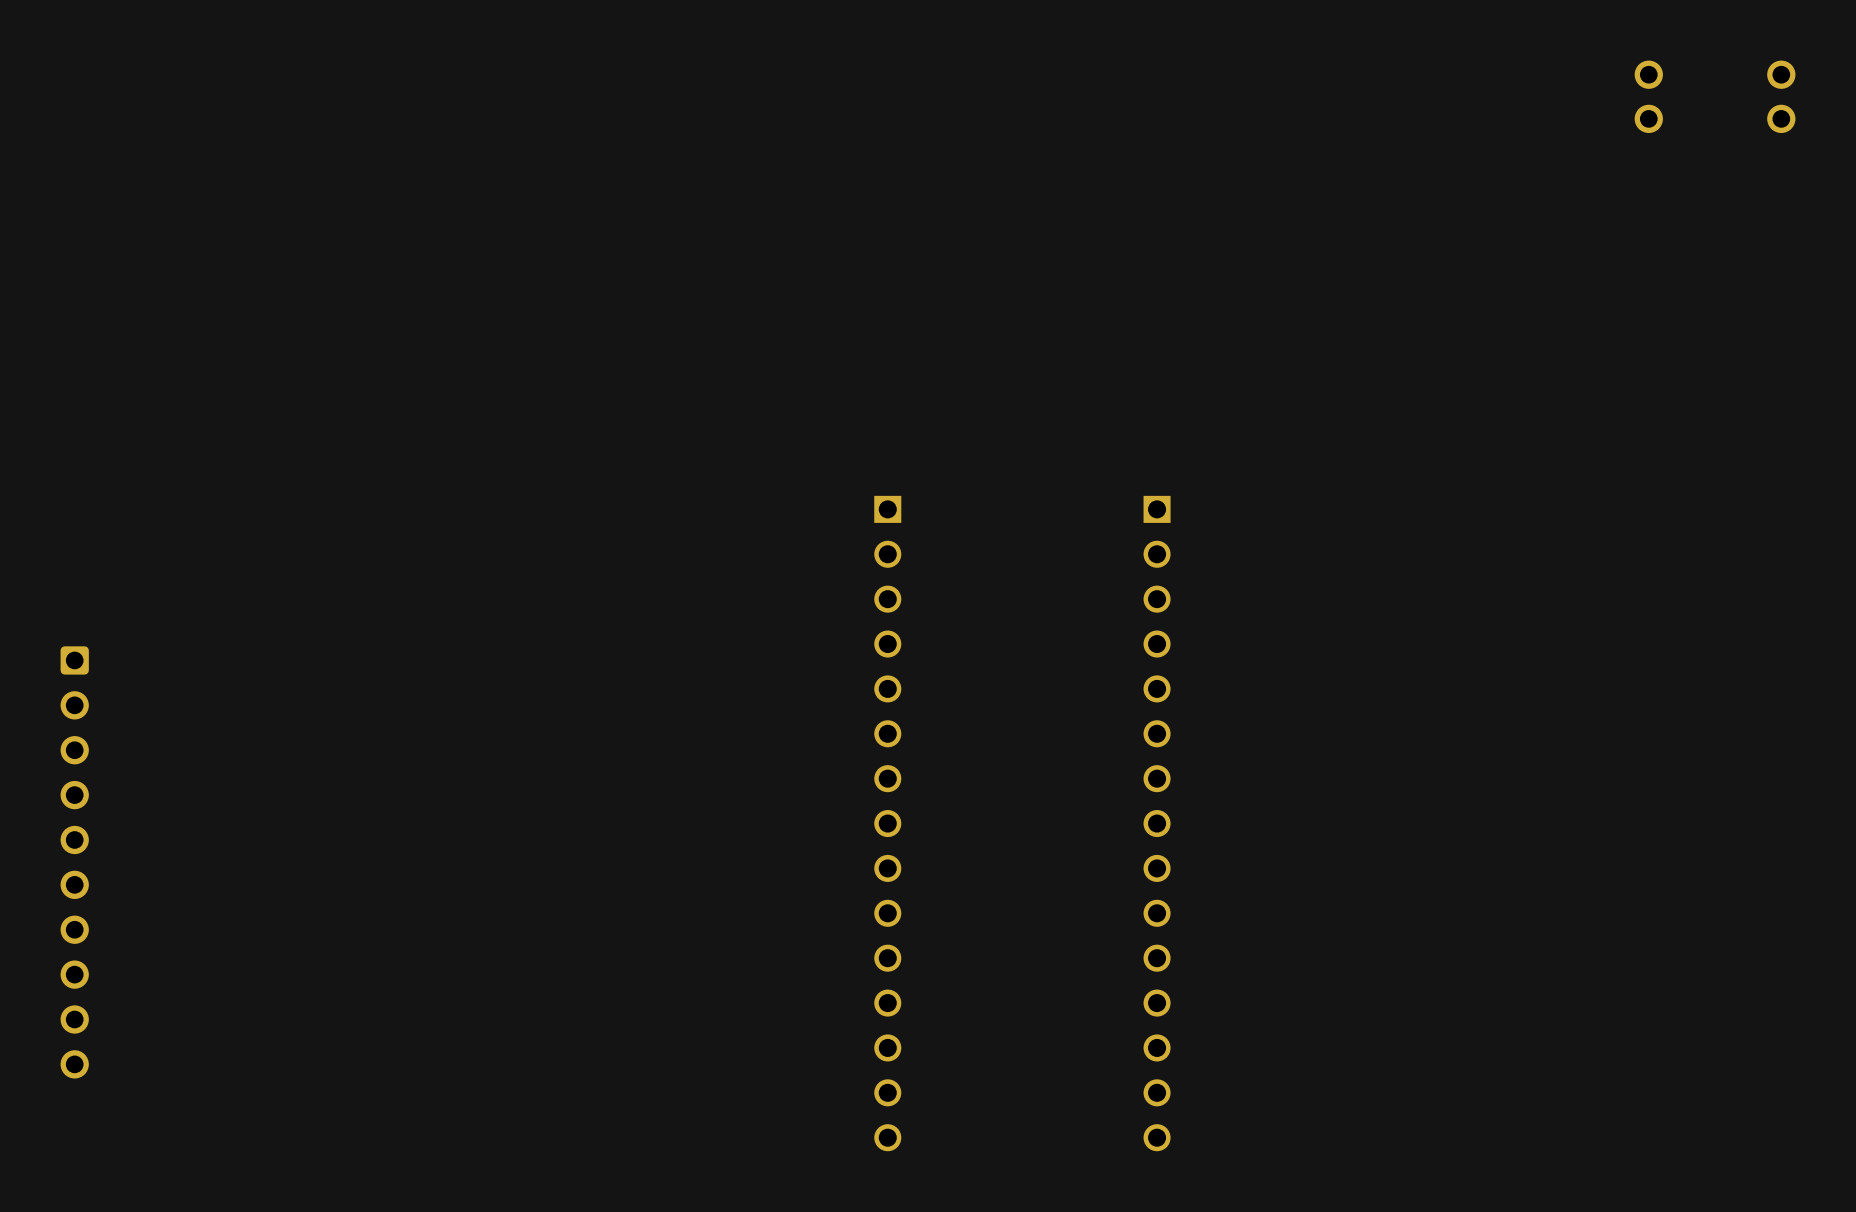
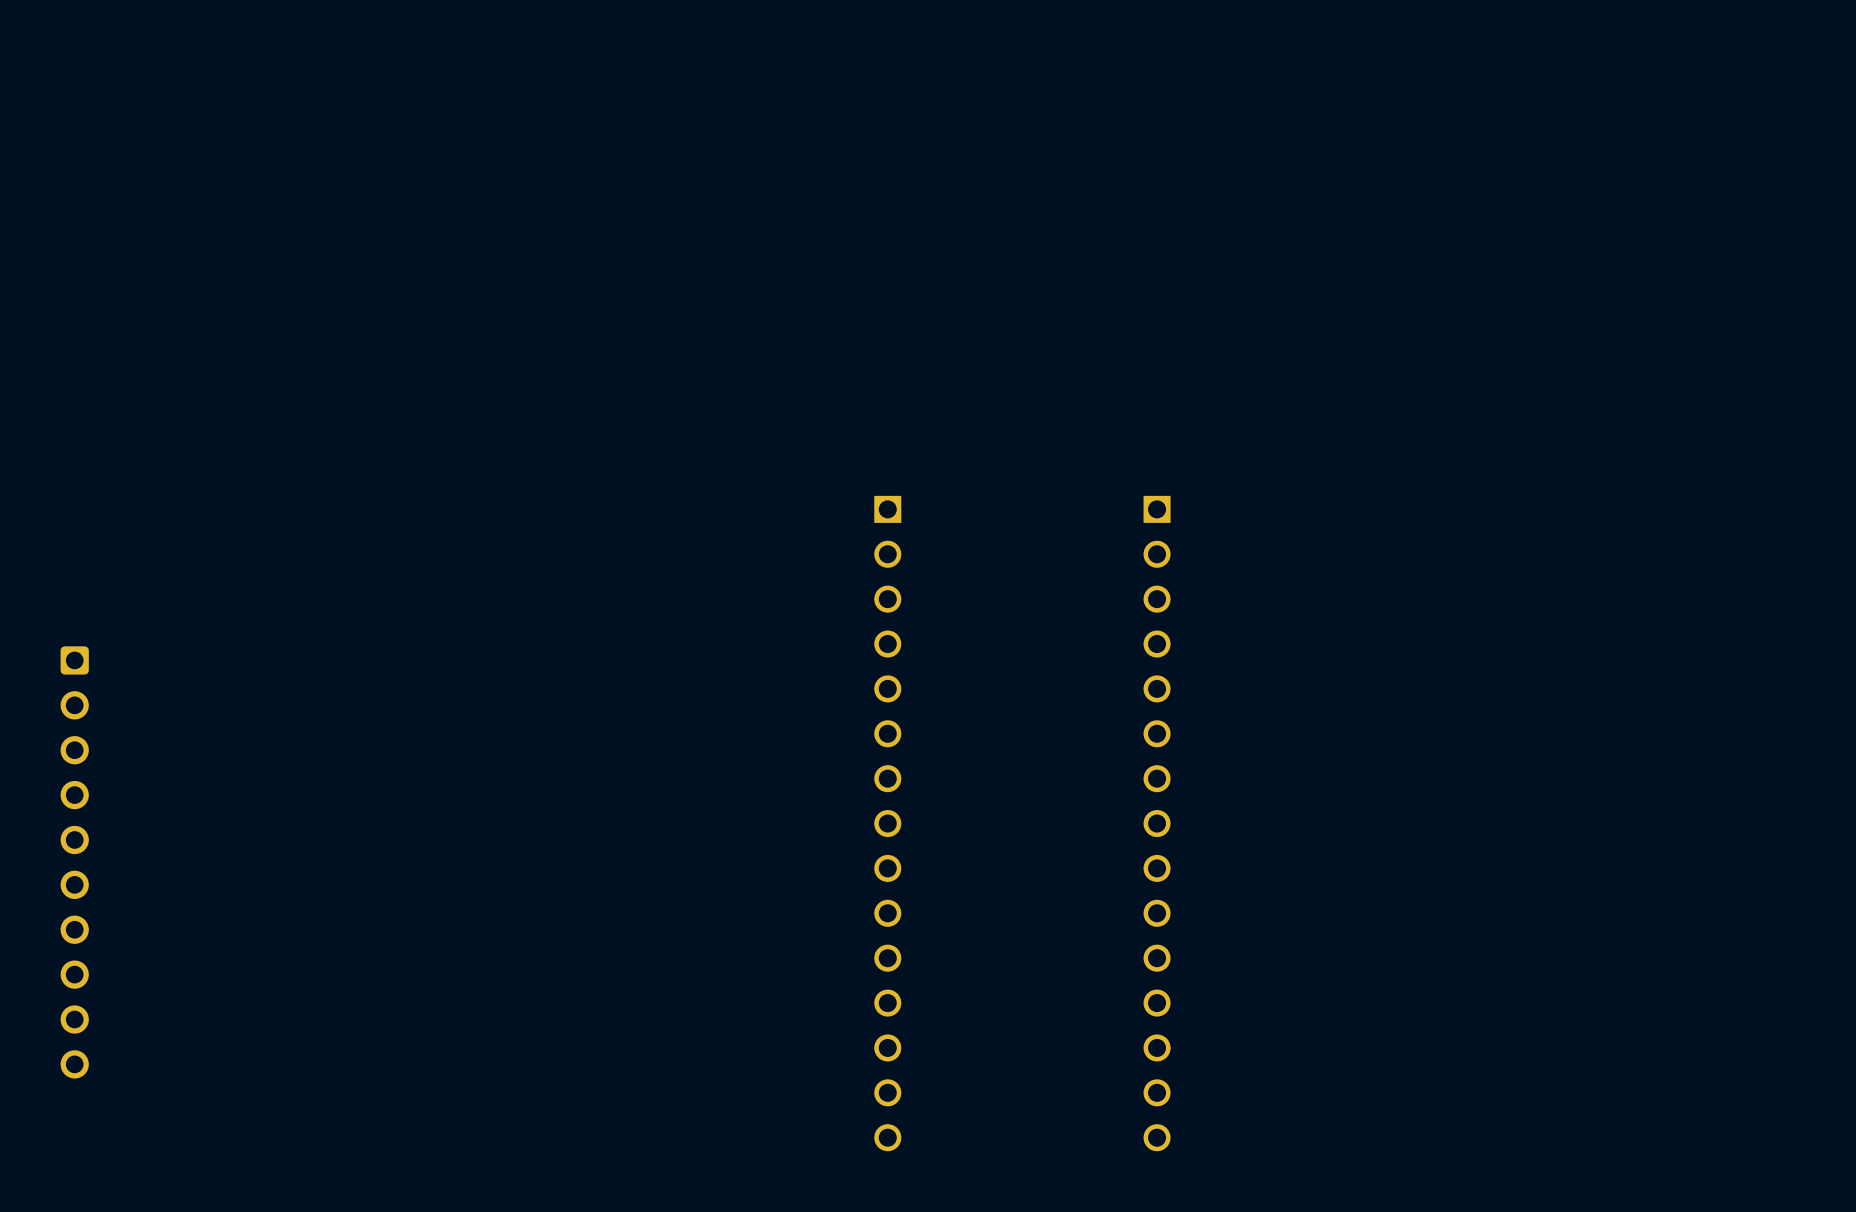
part: (1648, 96) -> none
part: (1781, 96) -> none

